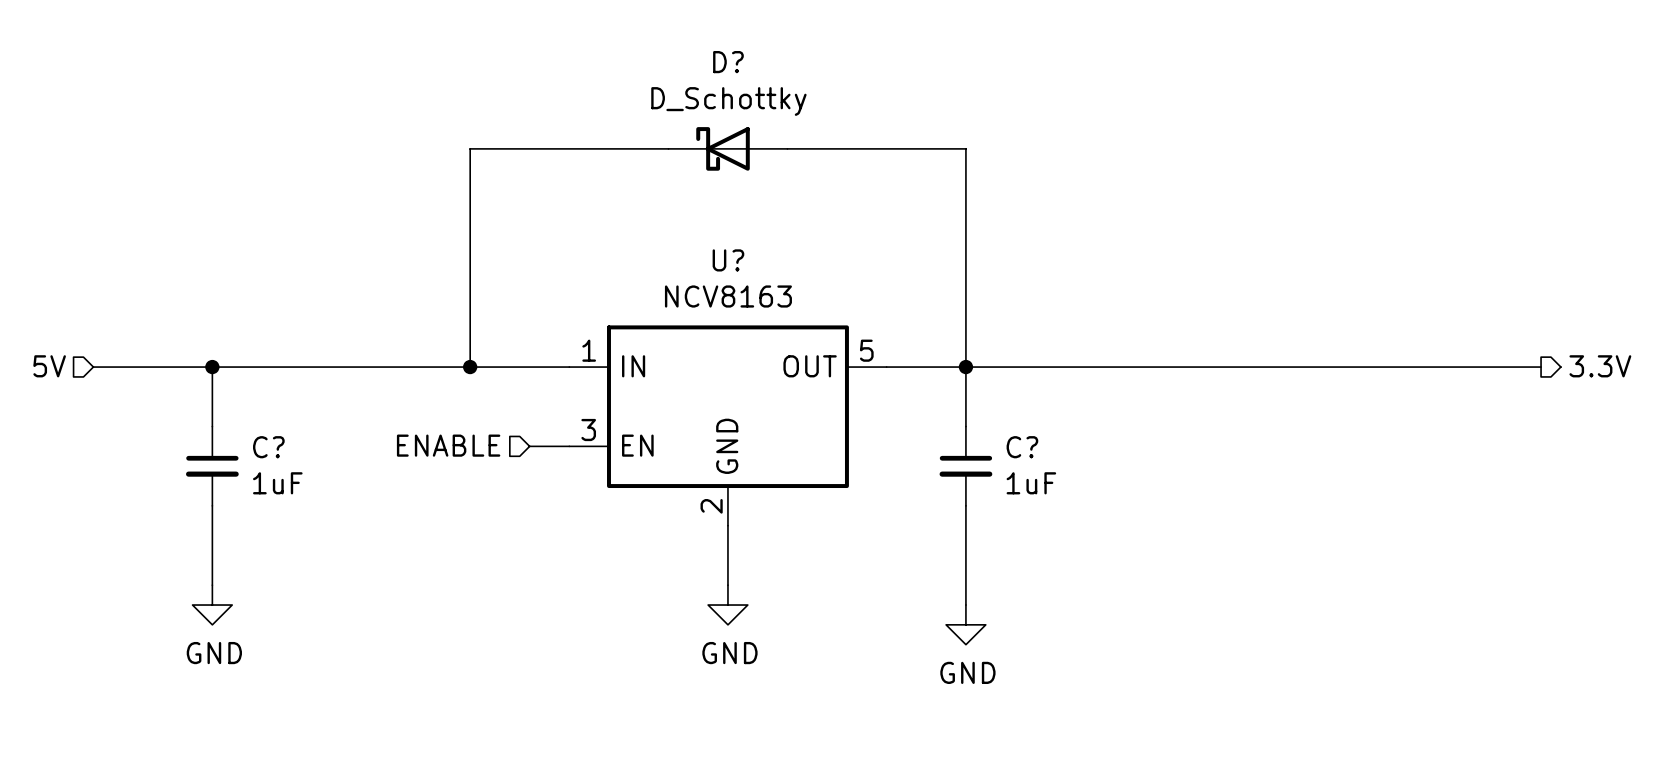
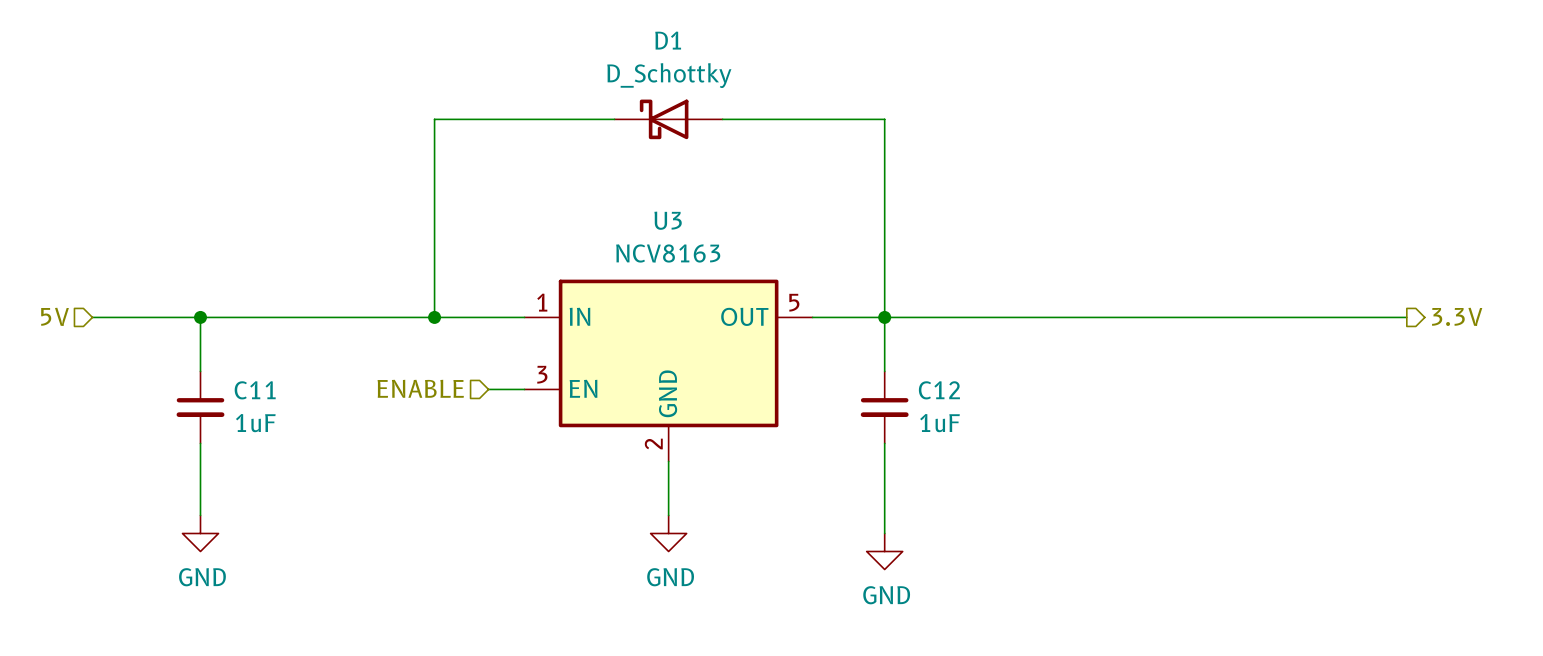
D? name: D? (728, 62) -> D1 (668, 40)
U? name: U? (728, 260) -> U3 (668, 220)
C? name: C? (268, 447) -> C11 (255, 390)
C? name: C? (1022, 447) -> C12 (939, 390)

